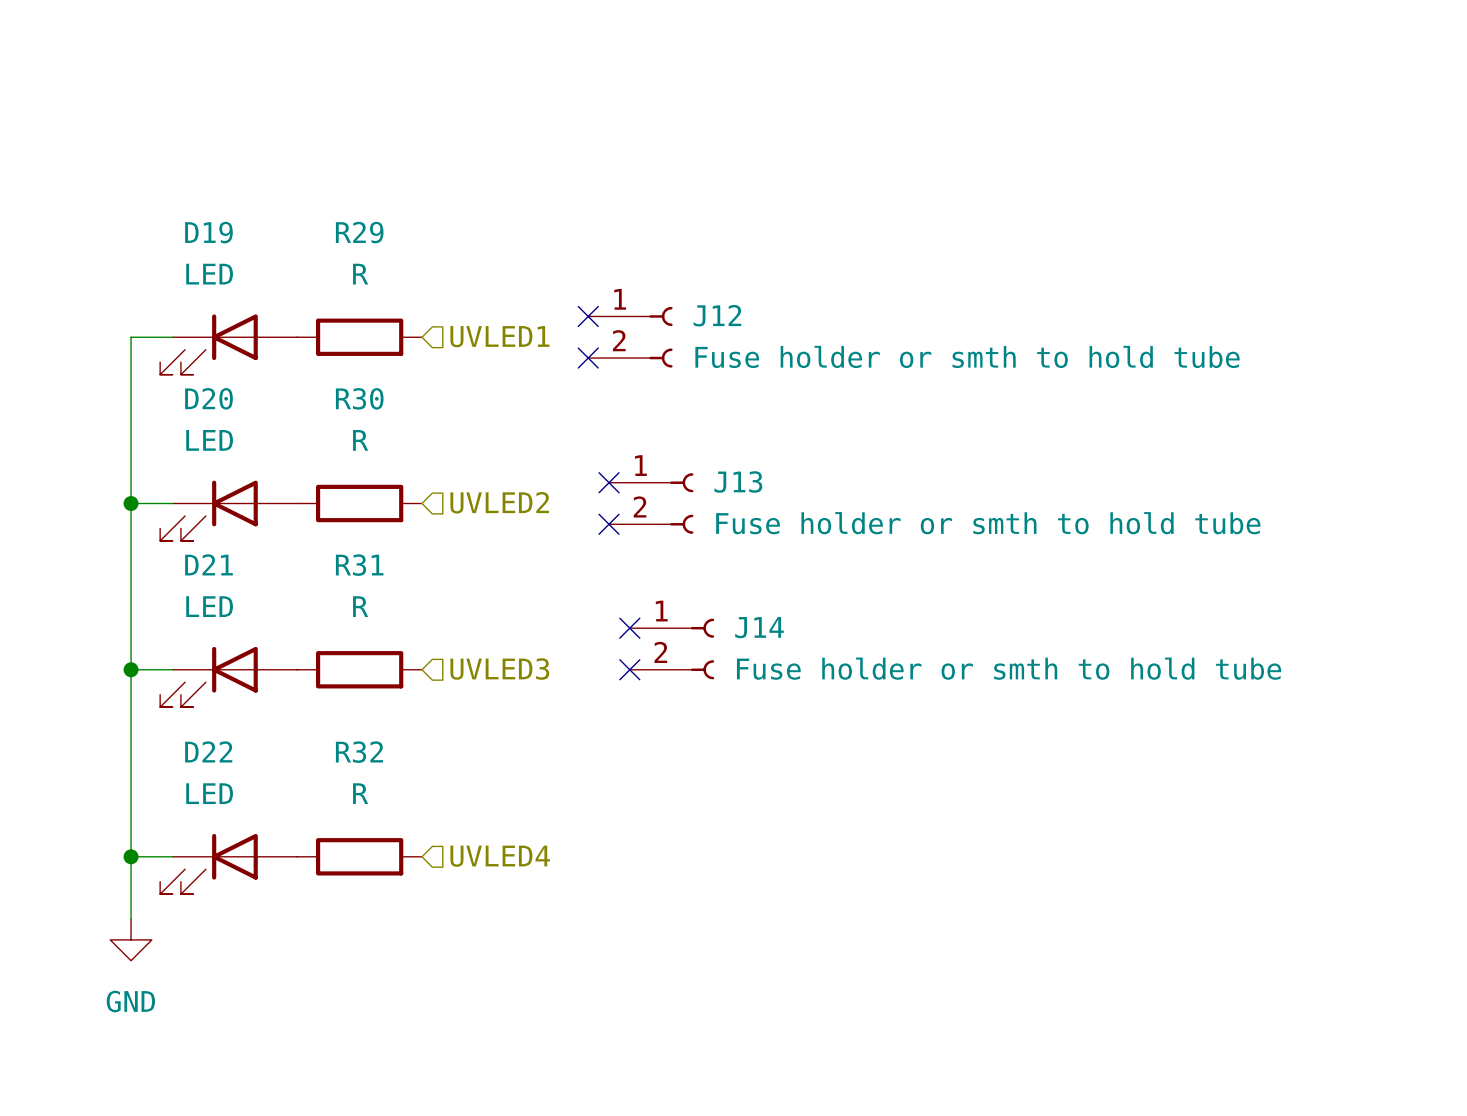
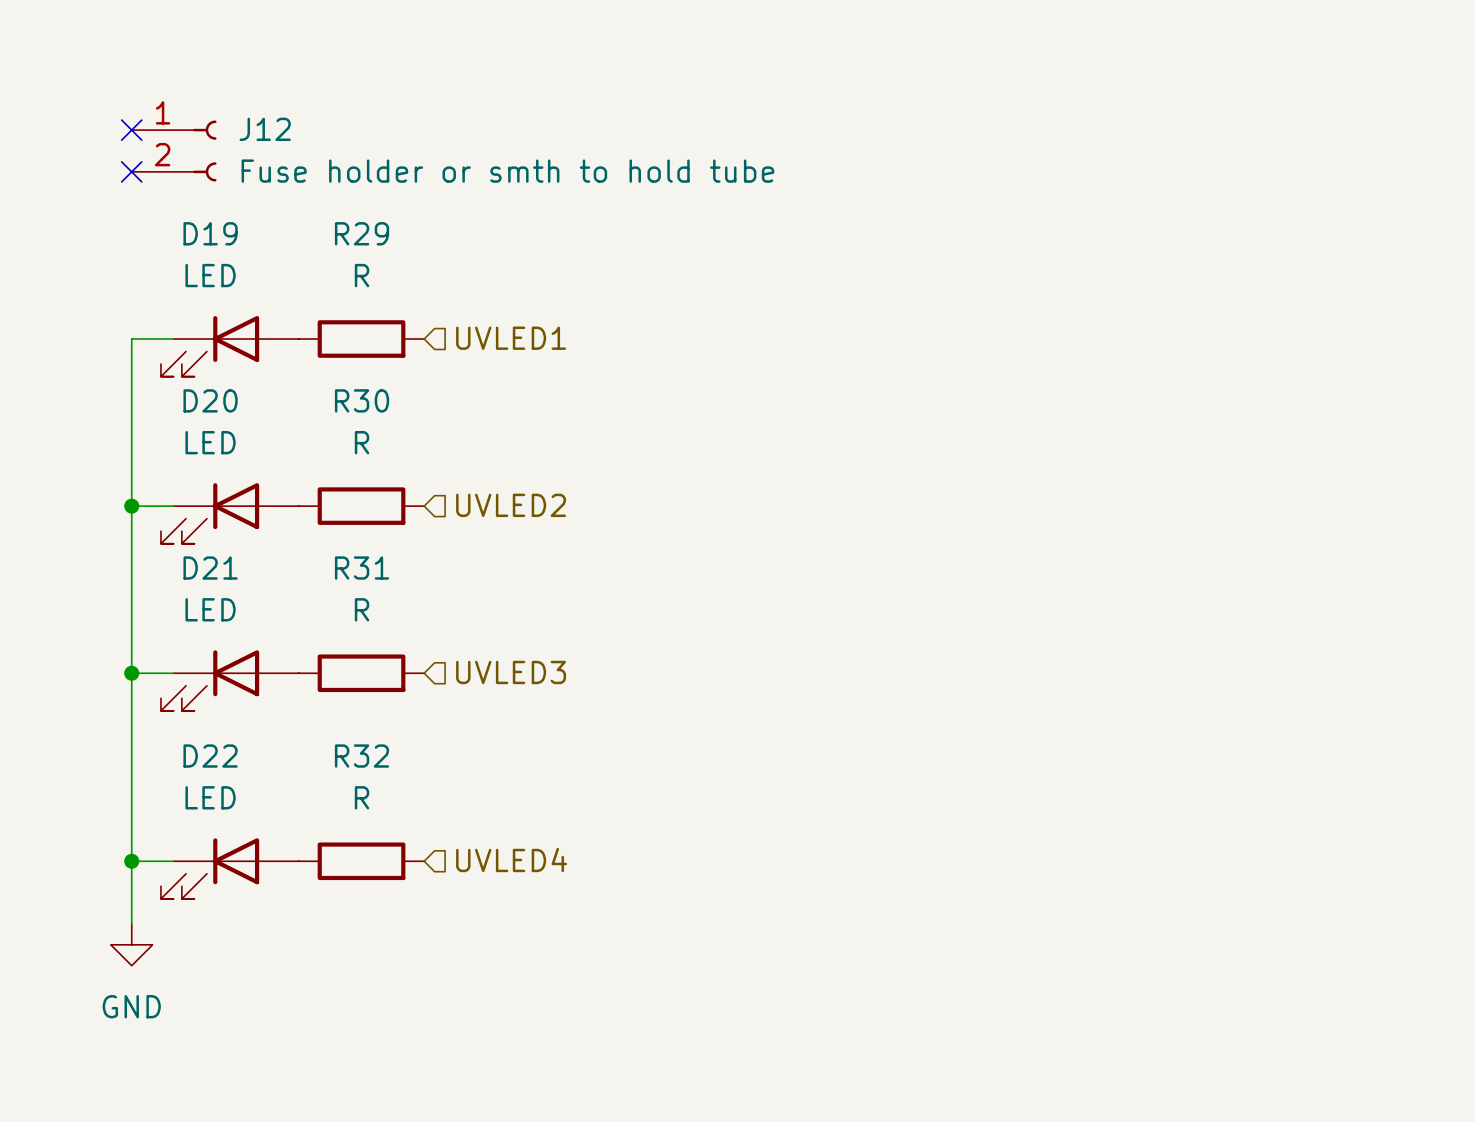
no-connect mark: none -> (131, 130)
no-connect mark: none -> (131, 171)
no-connect mark: (588, 316) -> none
J12 position: (630, 337) -> (174, 151)
no-connect mark: (588, 358) -> none
no-connect mark: (609, 482) -> none
J13: Fuse holder or smth to hold tube (651, 503) -> none
no-connect mark: (609, 524) -> none
no-connect mark: (629, 628) -> none
J14: Fuse holder or smth to hold tube (671, 648) -> none
no-connect mark: (629, 669) -> none

